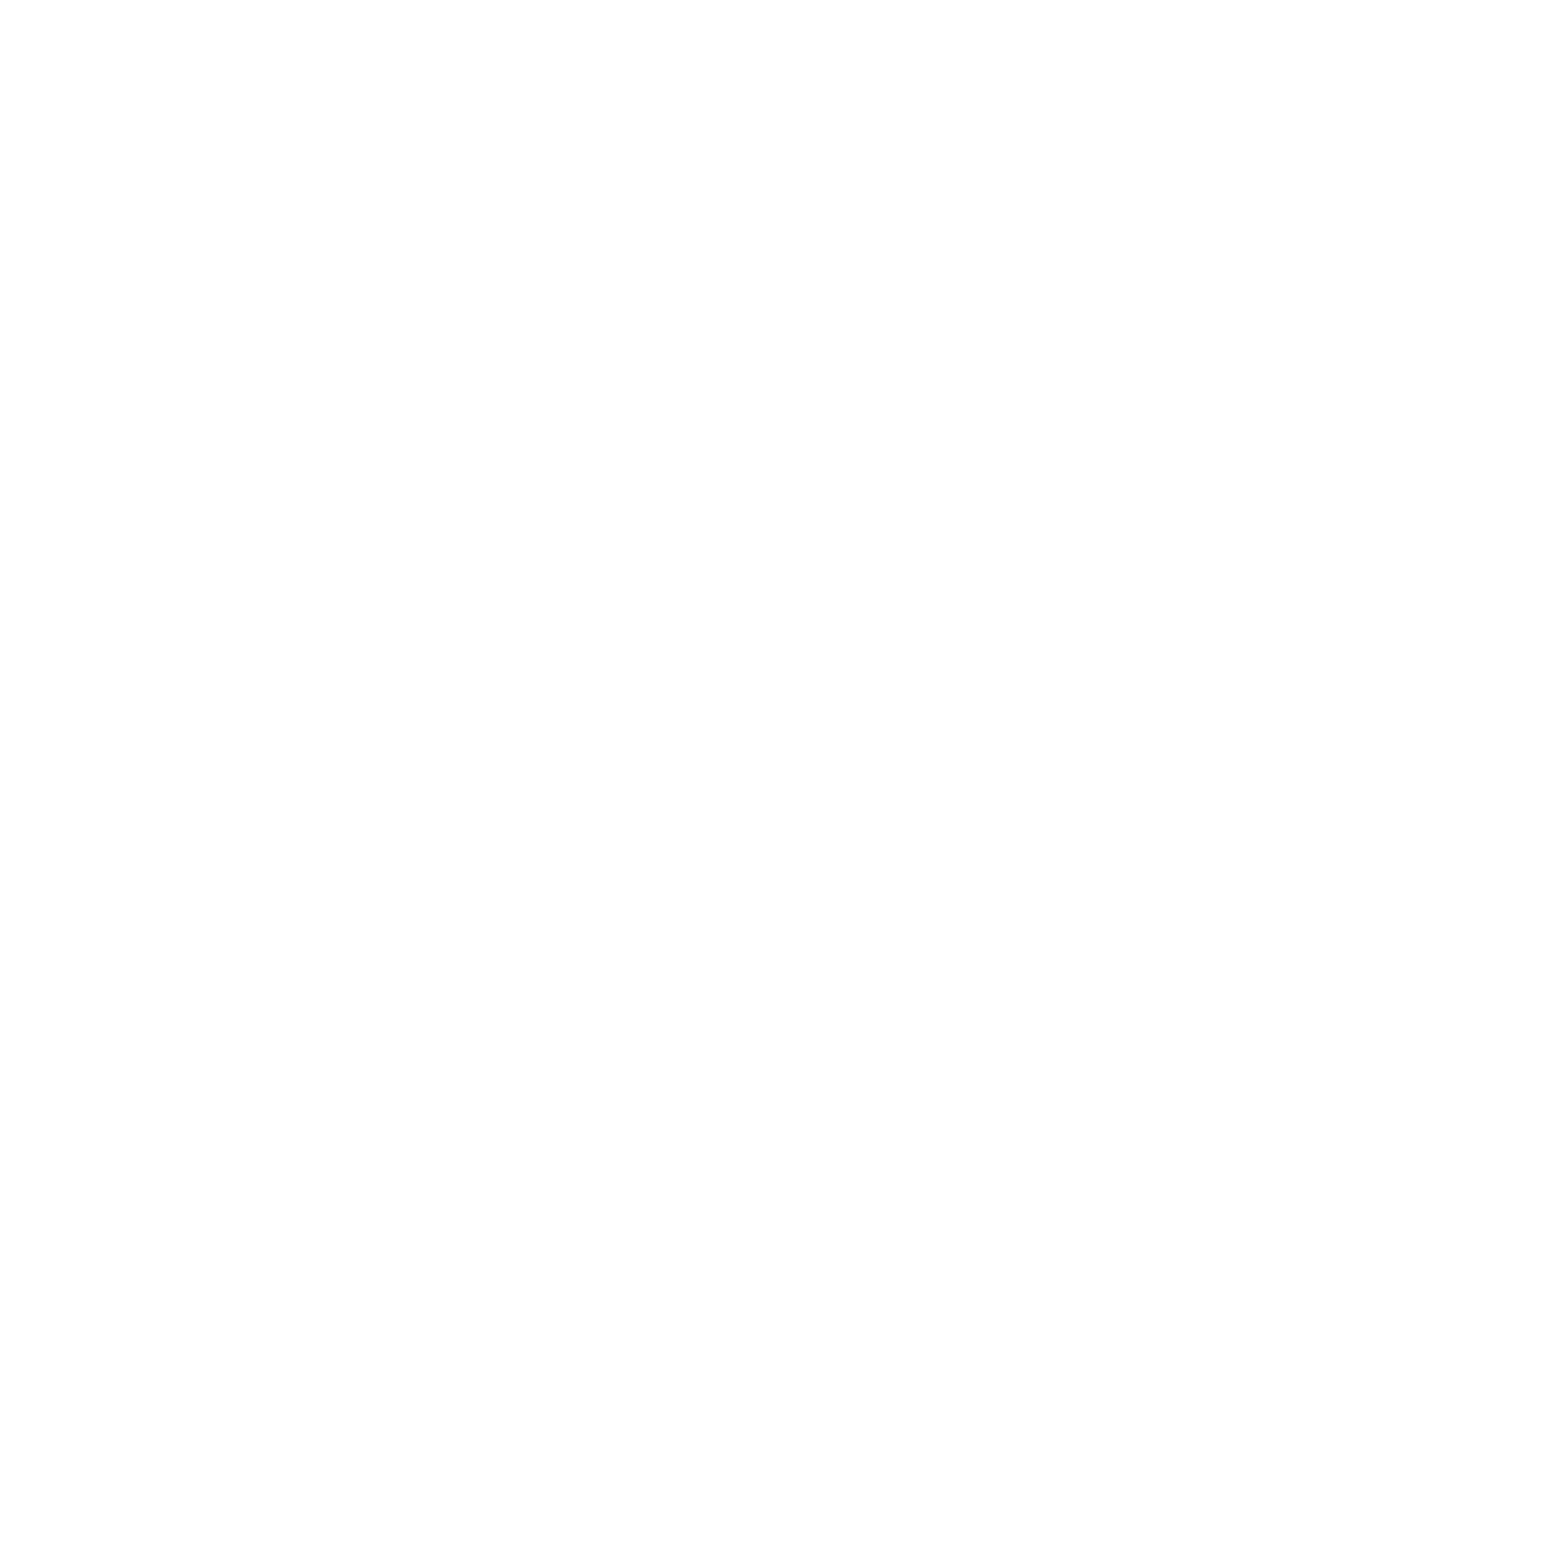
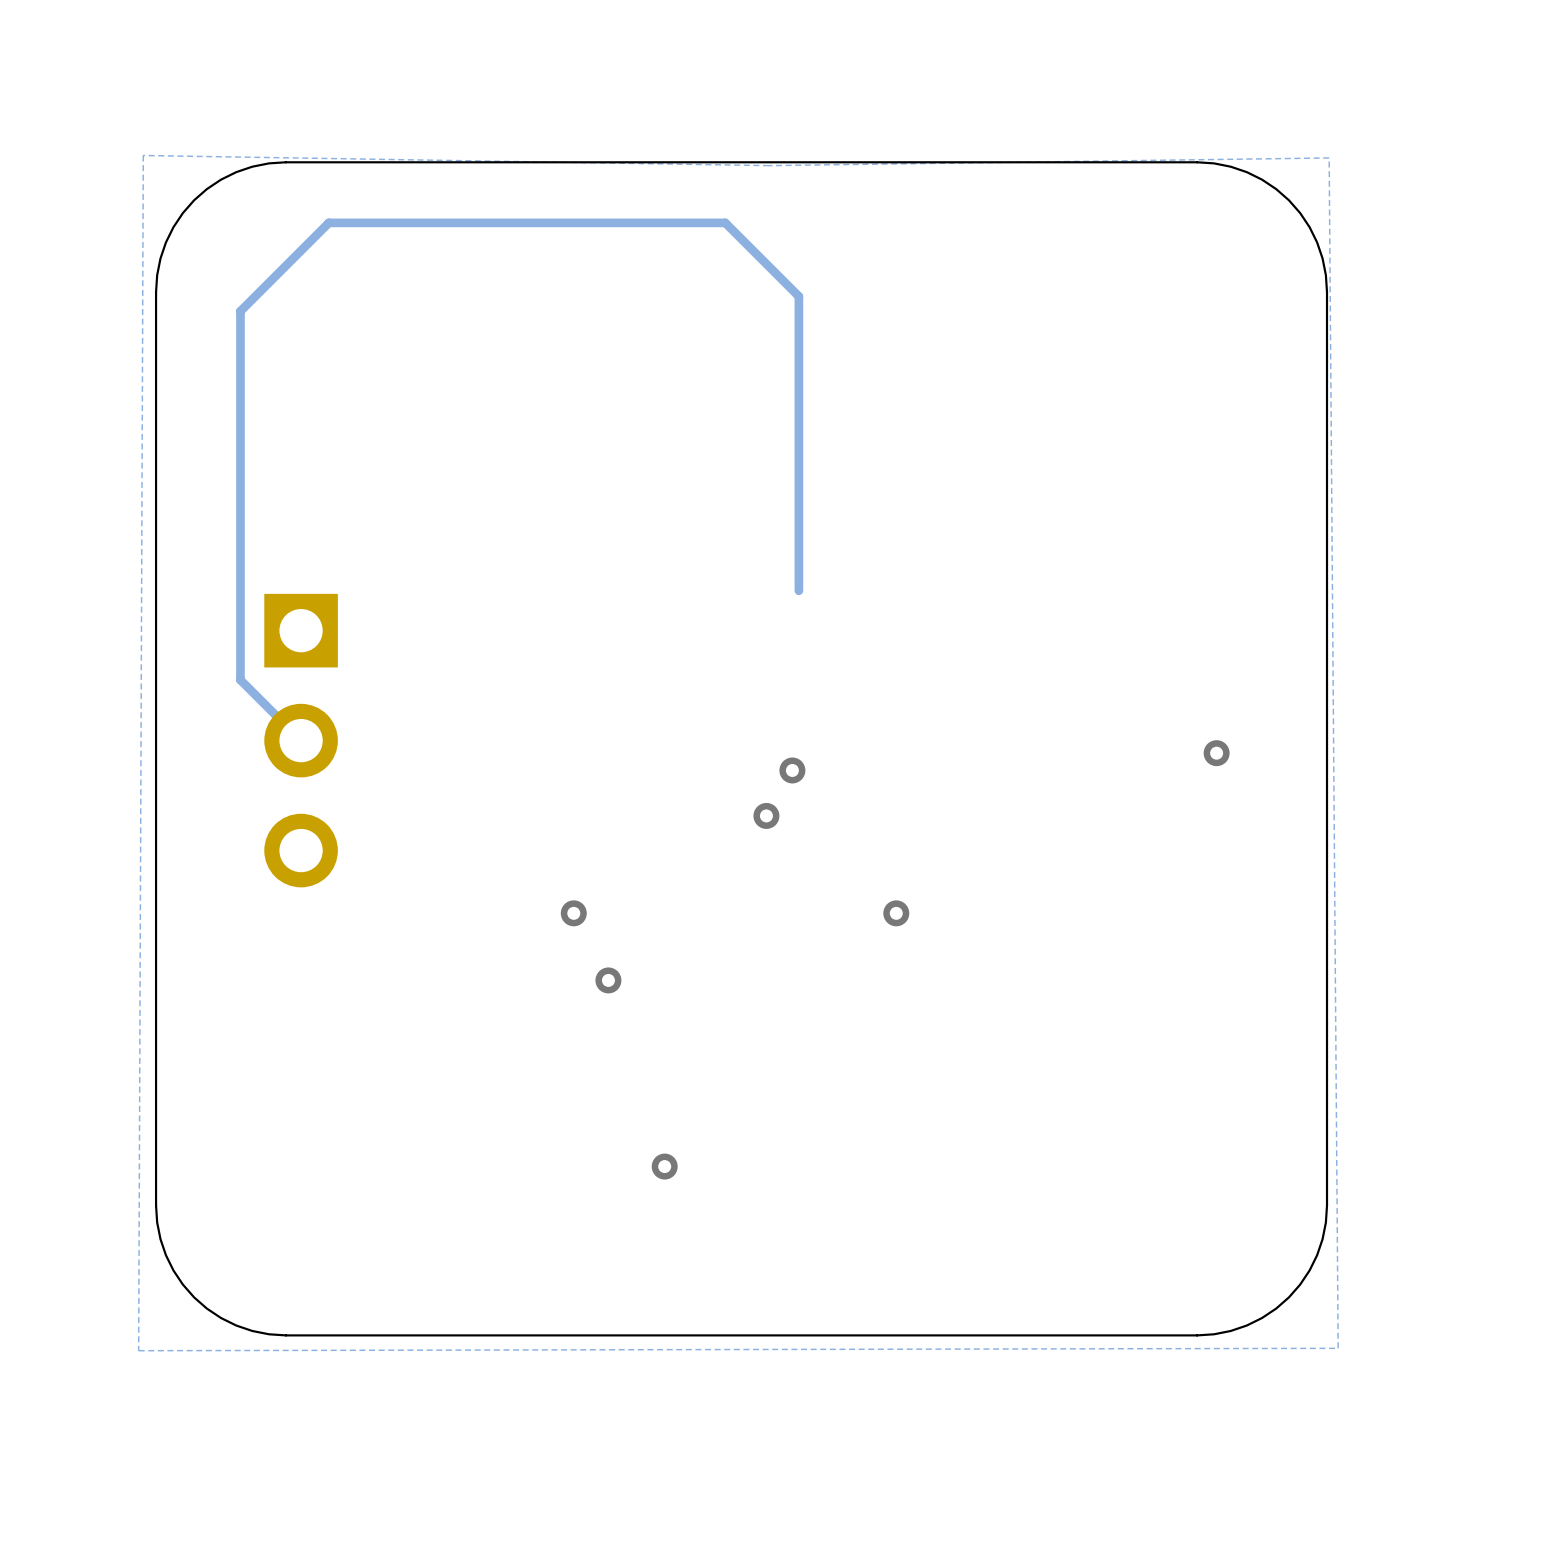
zone outline: none -> (143, 155) (768, 165) (1329, 157) (1338, 1348) (138, 1350) (143, 155)
board edge: none -> (1197, 162) (285, 162) (268, 163) (236, 172) (206, 189) (182, 213) (165, 242) (160, 258) (156, 292) (156, 1205) (160, 1239) (165, 1255) (182, 1284) (206, 1308) (236, 1325) (252, 1330) (285, 1335) (1197, 1335) (1214, 1334) (1246, 1325) (1276, 1308) (1300, 1284) (1317, 1255) (1322, 1239) (1327, 1205) (1325, 275) (1322, 258) (1309, 227) (1288, 200) (1276, 189) (1262, 179) (1230, 166) (1197, 162)
track: none -> (798, 590) (798, 296) (725, 222) (328, 222) (240, 311) (240, 680) (301, 740)
part: none -> (301, 740)
via: none -> (1216, 753)
via: none -> (792, 770)
via: none -> (766, 815)
via: none -> (573, 913)
via: none -> (896, 913)
via: none -> (608, 980)
via: none -> (664, 1166)

